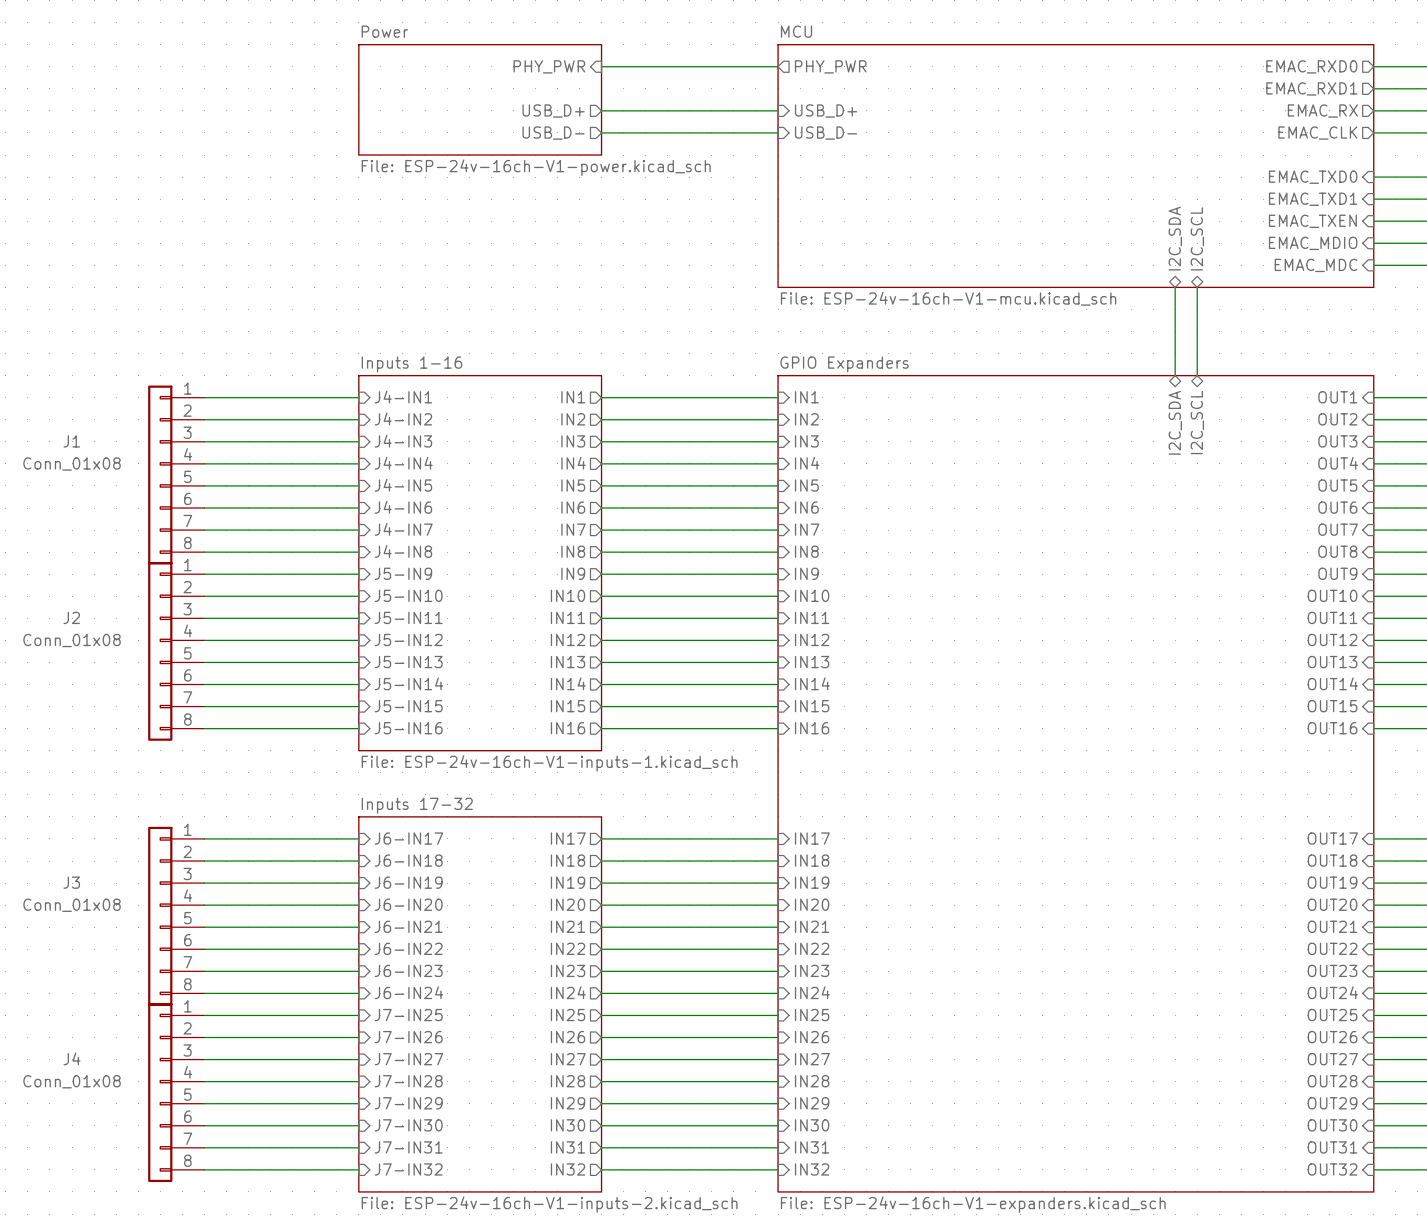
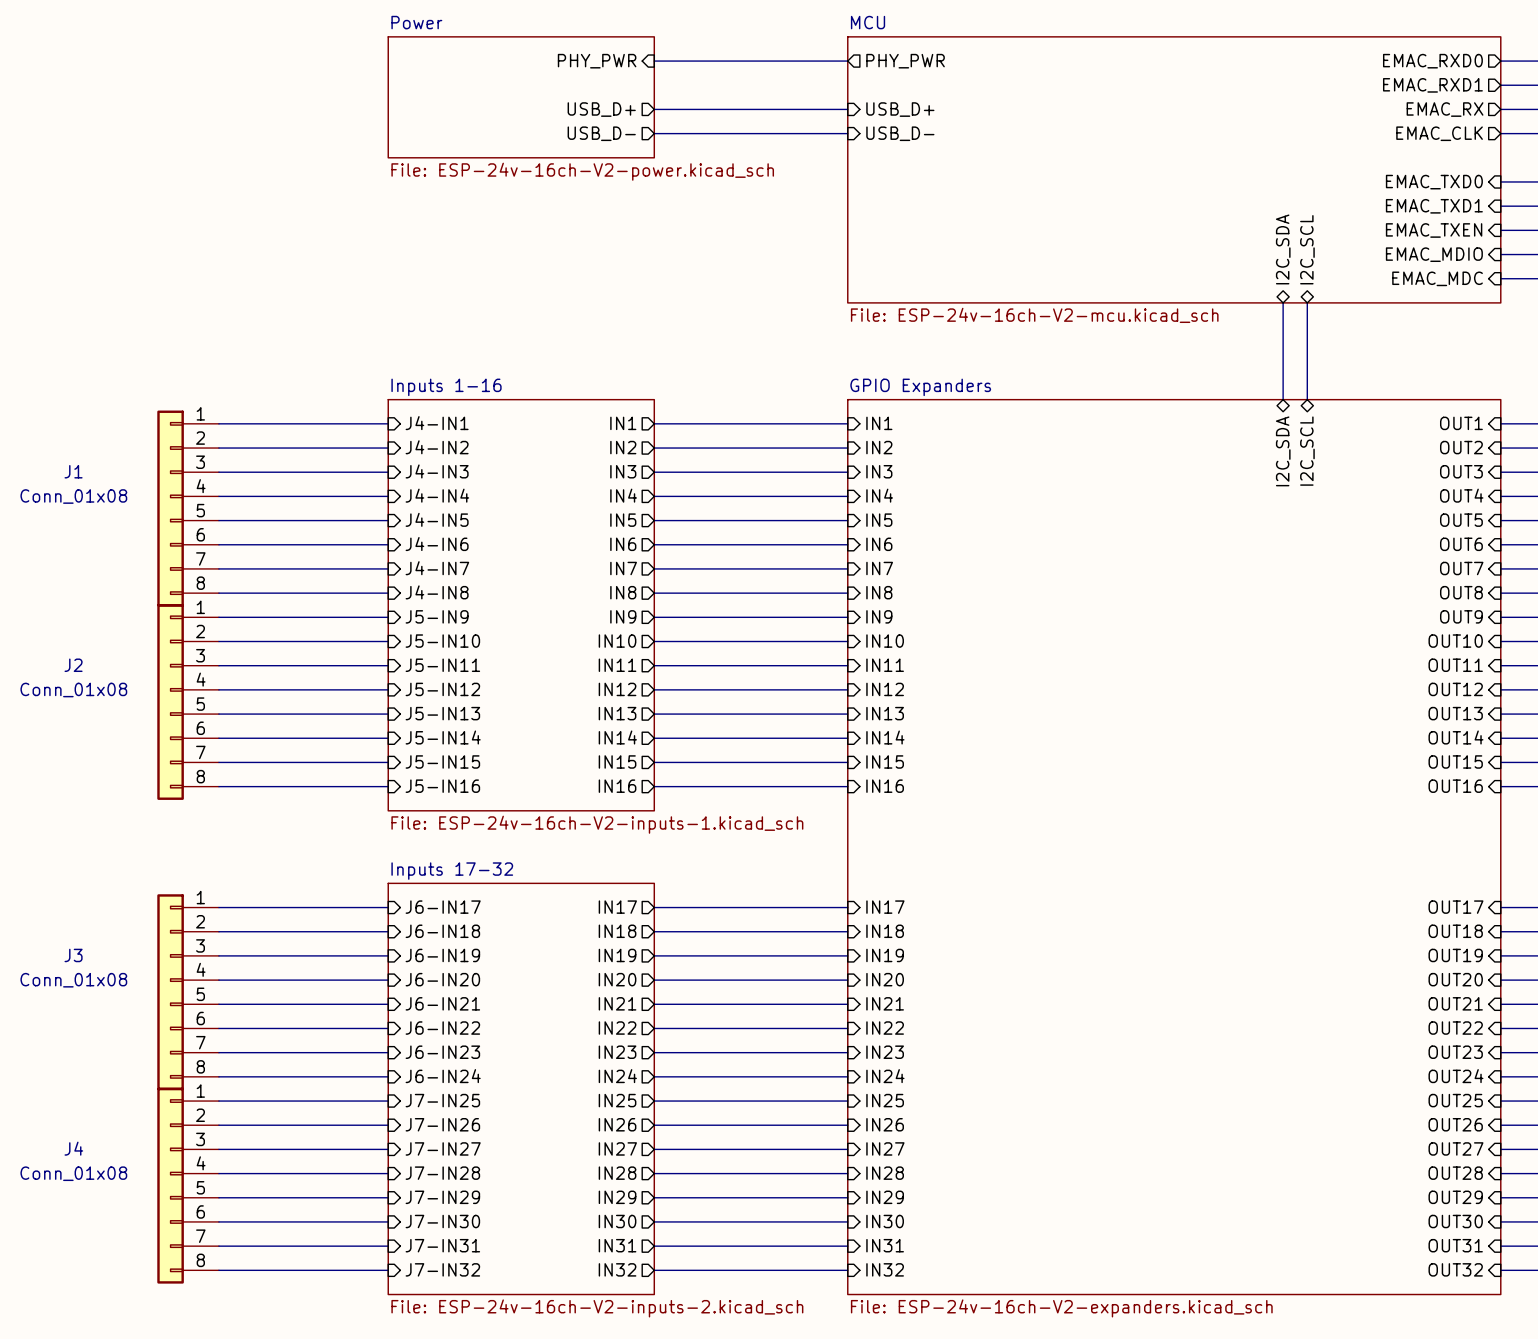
sheet Power value: File: ESP-24v-16ch-V1-power.kicad_sch (536, 167) -> File: ESP-24v-16ch-V2-power.kicad_sch (582, 171)
sheet MCU value: File: ESP-24v-16ch-V1-mcu.kicad_sch (948, 298) -> File: ESP-24v-16ch-V2-mcu.kicad_sch (1034, 315)
sheet Inputs 1-16 value: File: ESP-24v-16ch-V1-inputs-1.kicad_sch (549, 763) -> File: ESP-24v-16ch-V2-inputs-1.kicad_sch (597, 824)
sheet Inputs 17-32 value: File: ESP-24v-16ch-V1-inputs-2.kicad_sch (549, 1204) -> File: ESP-24v-16ch-V2-inputs-2.kicad_sch (597, 1308)
sheet GPIO Expanders value: File: ESP-24v-16ch-V1-expanders.kicad_sch (973, 1204) -> File: ESP-24v-16ch-V2-expanders.kicad_sch (1061, 1308)

